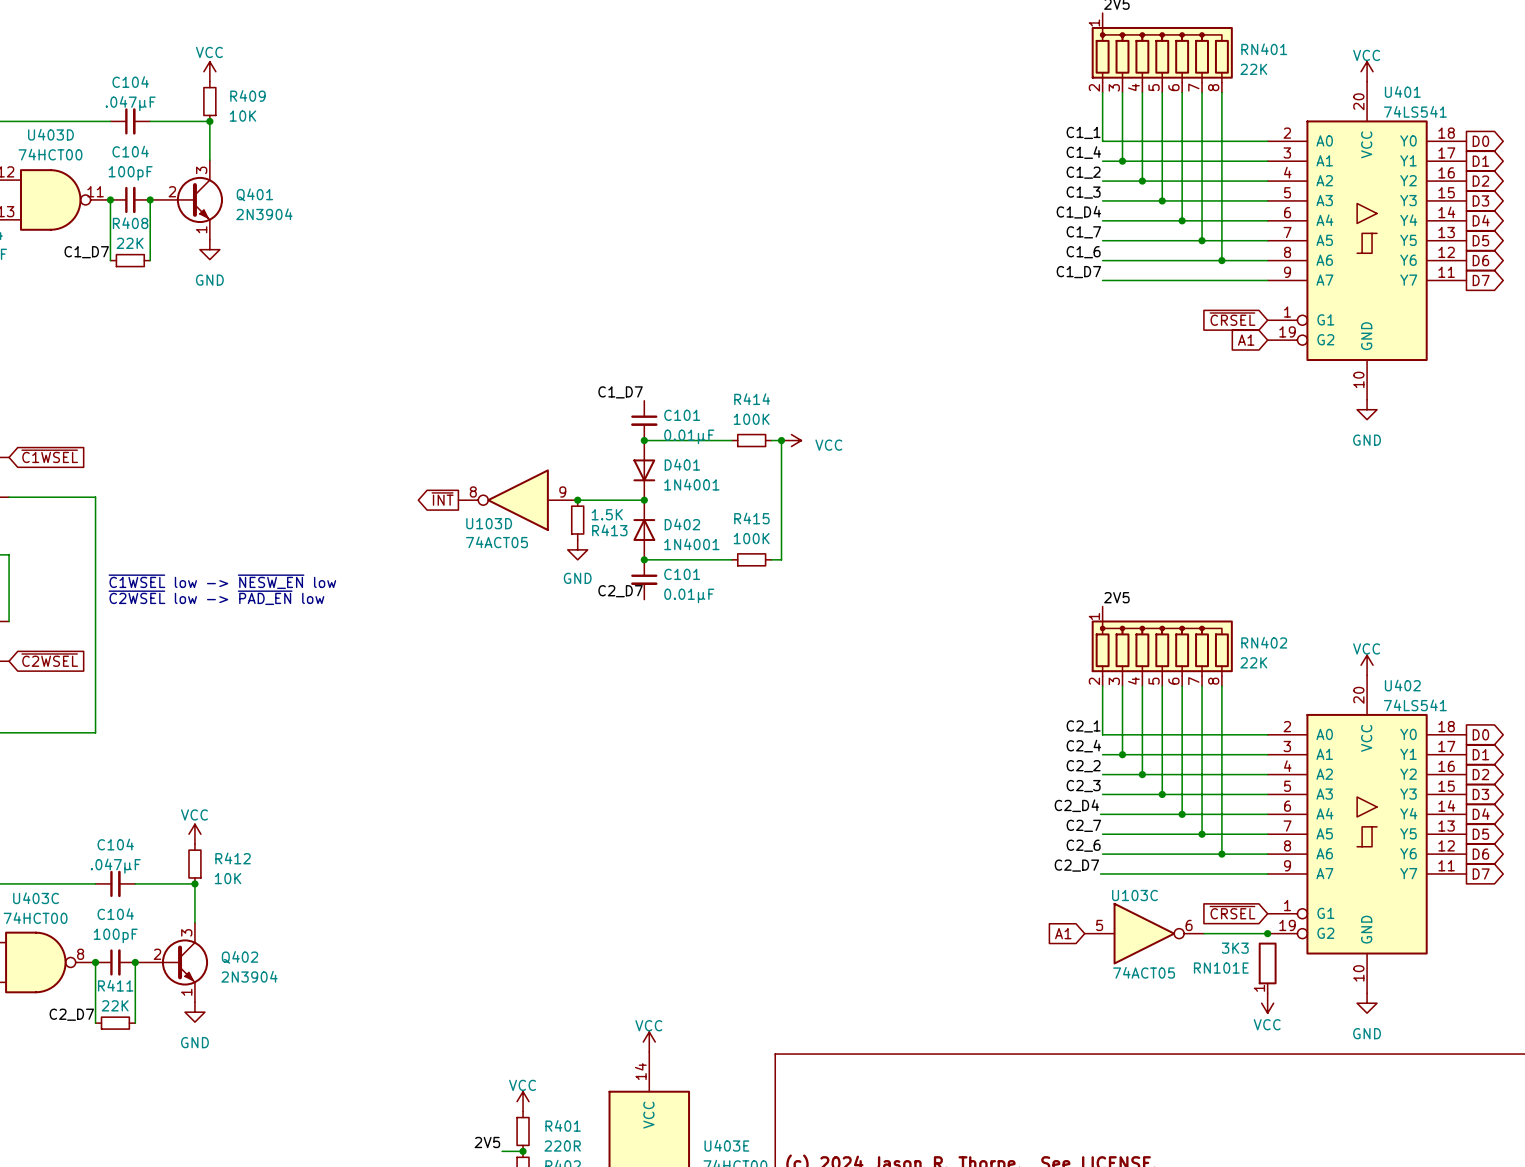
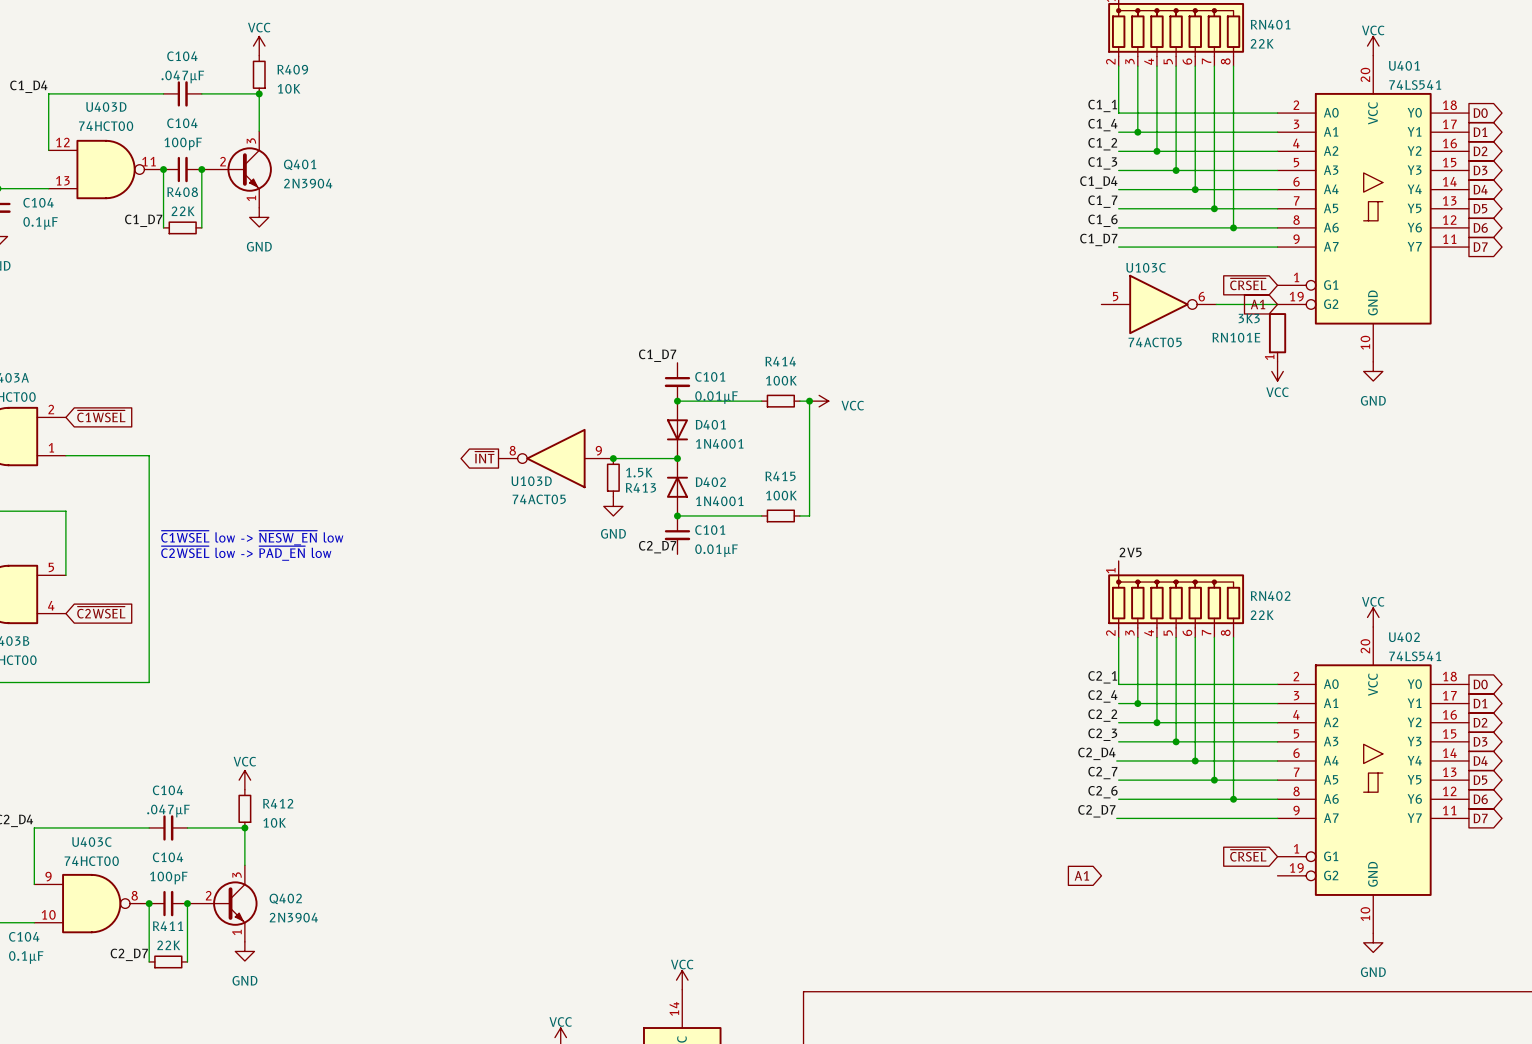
wire: none -> (1216, 304) (1277, 304)
power symbol: none -> VCC (1277, 371)
U103C position: (1144, 933) -> (1158, 304)
wire: (1204, 933) (1267, 933) -> none
junction: (1267, 933) -> none
RN101E position: (1267, 967) -> (1277, 337)
power symbol: VCC (1267, 1003) -> none

